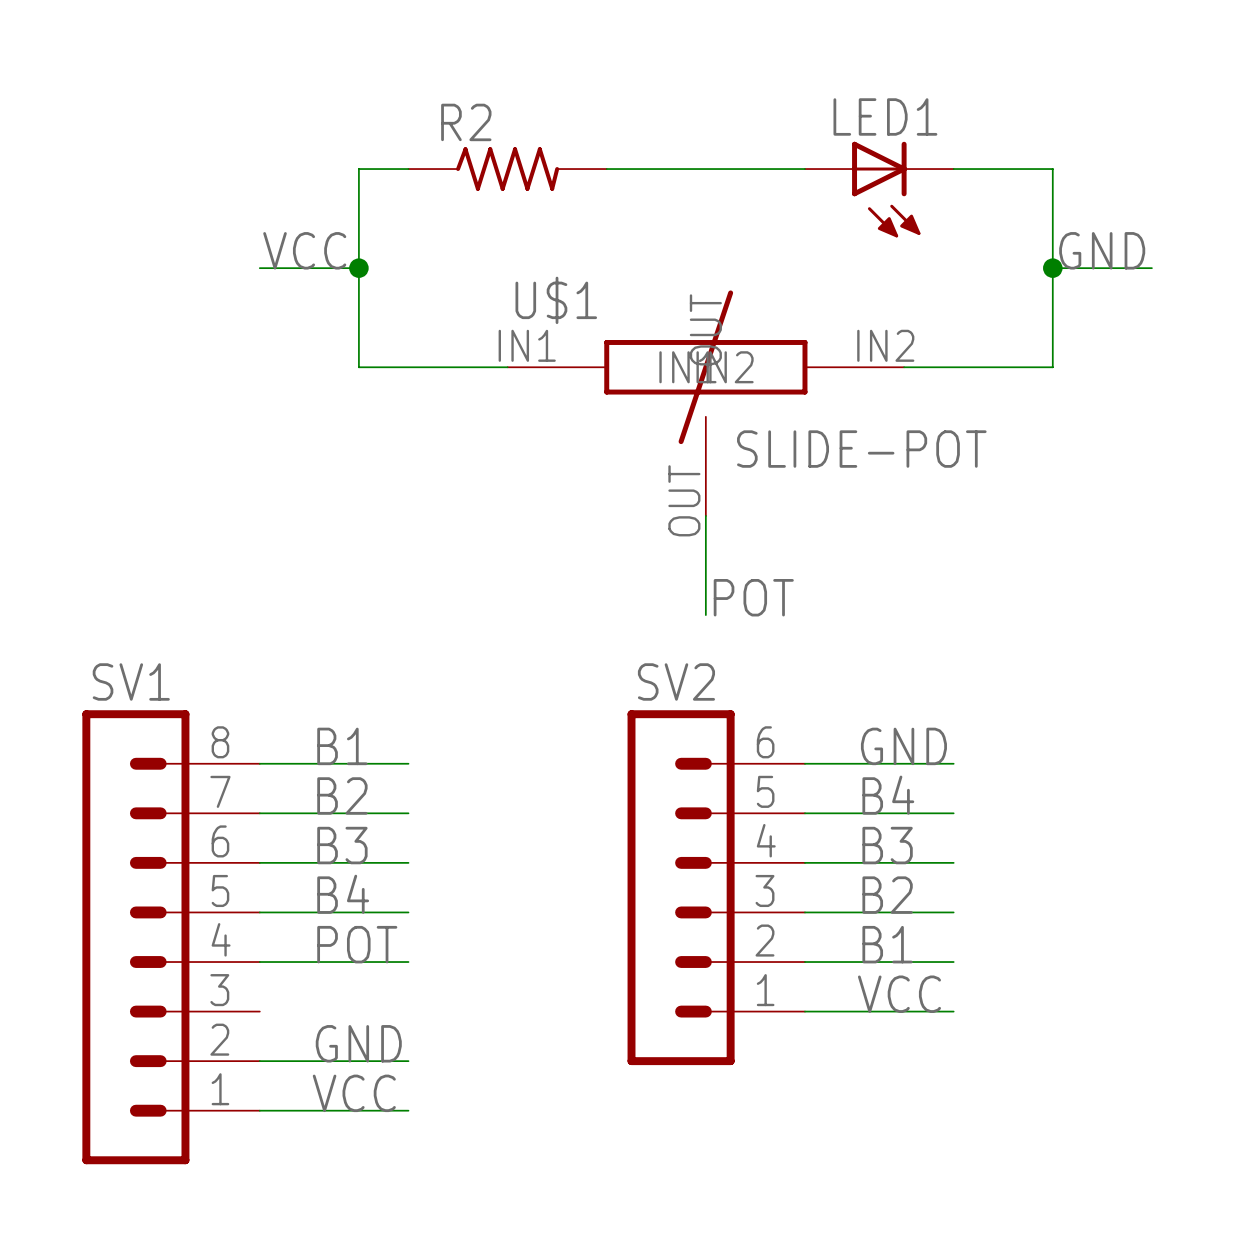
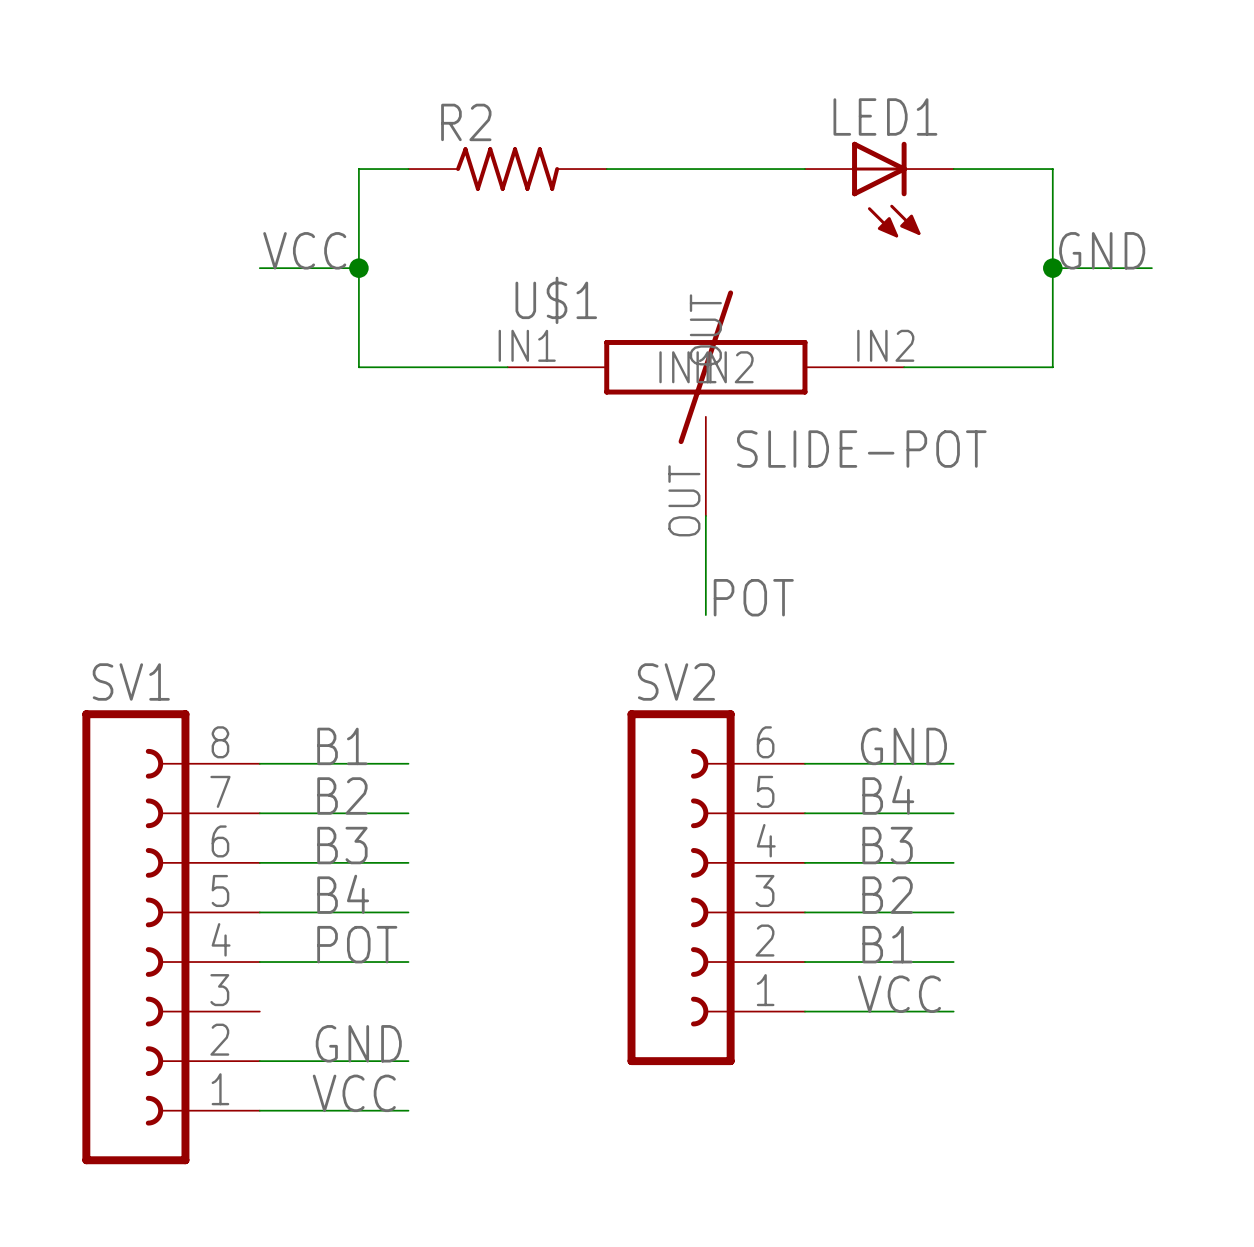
SV1 symbol: [82, 710, 260, 1165] -> [82, 710, 260, 1165]
SV2 symbol: [627, 710, 805, 1066] -> [627, 710, 805, 1066]

